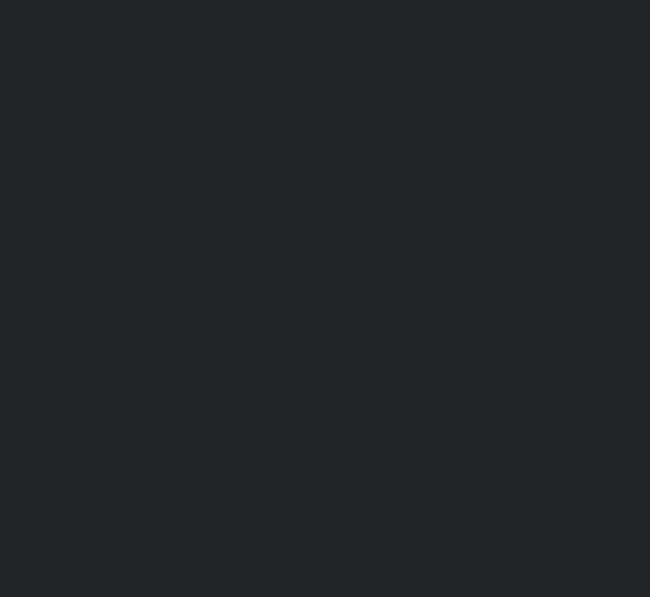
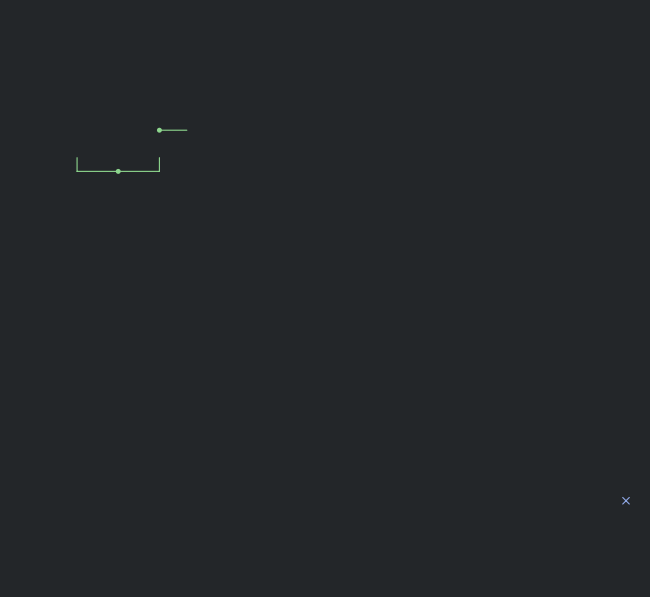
wire: none -> (159, 130) (186, 130)
junction: none -> (159, 130)
wire: none -> (77, 157) (77, 171) (159, 171) (159, 157)
junction: none -> (118, 171)
no-connect mark: none -> (626, 500)

